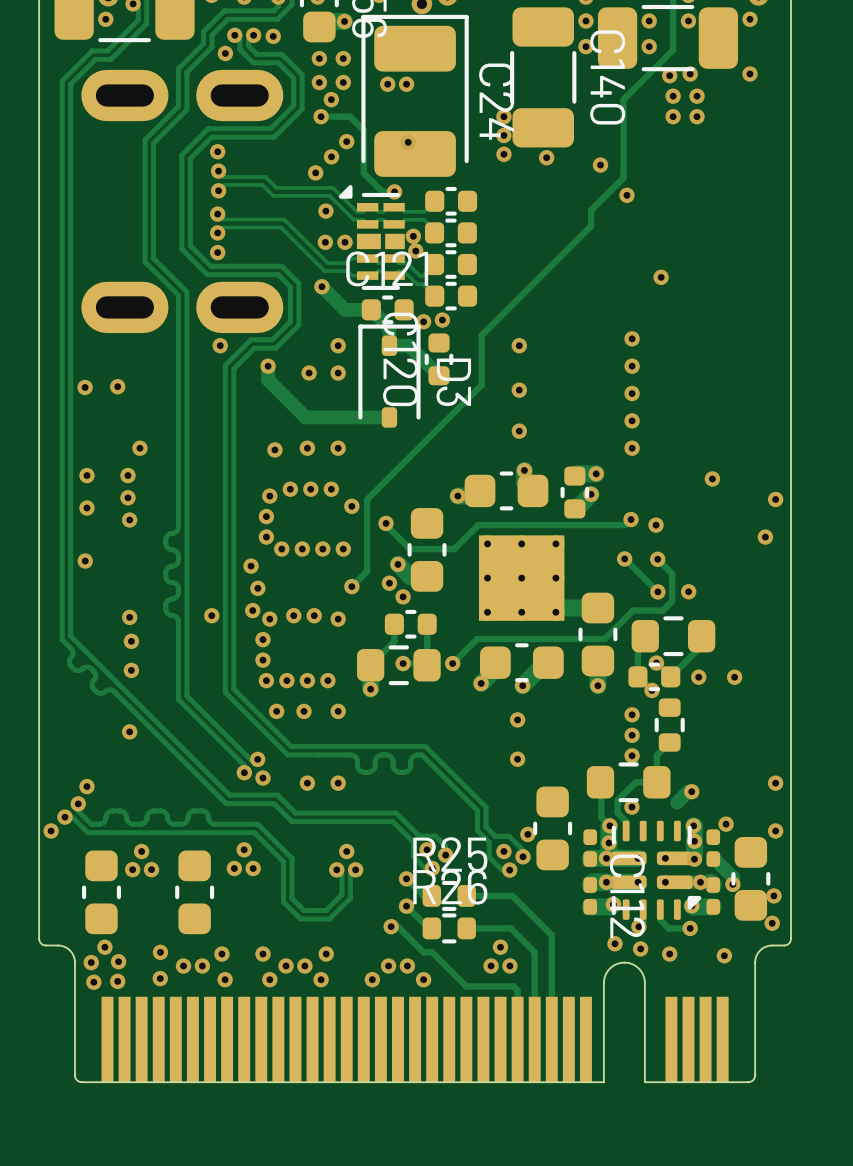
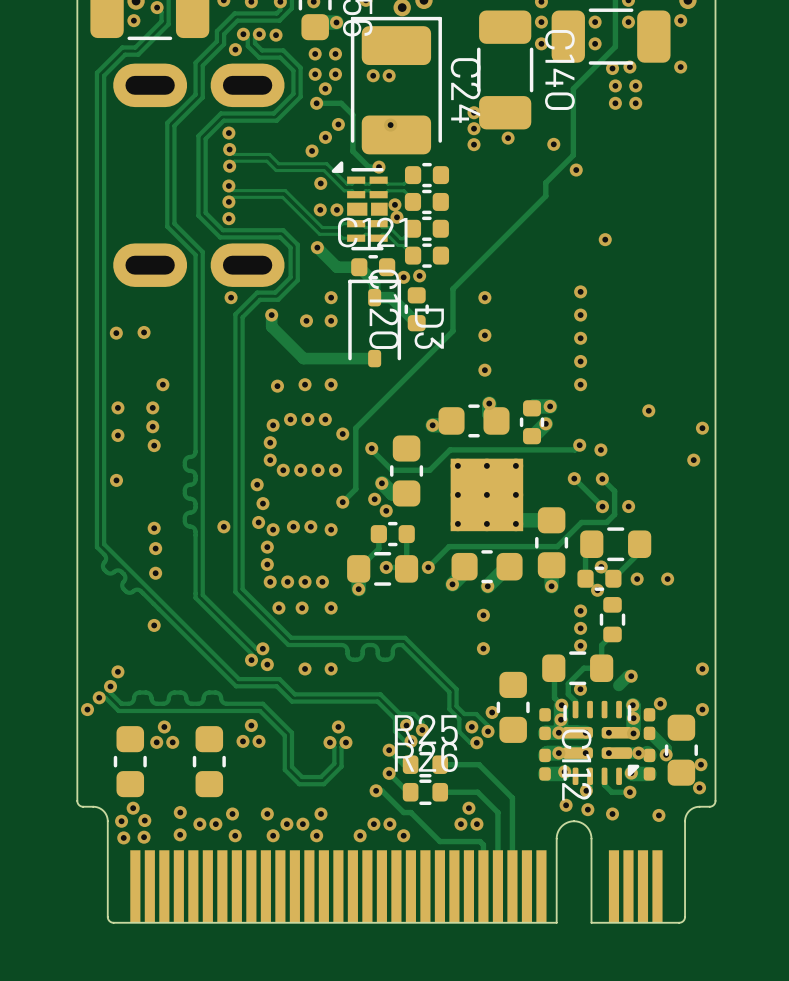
via: (503, 116) -> none
via: none -> (474, 112)
via: (503, 135) -> none
via: none -> (474, 128)
via: (503, 154) -> none
via: none -> (474, 144)

